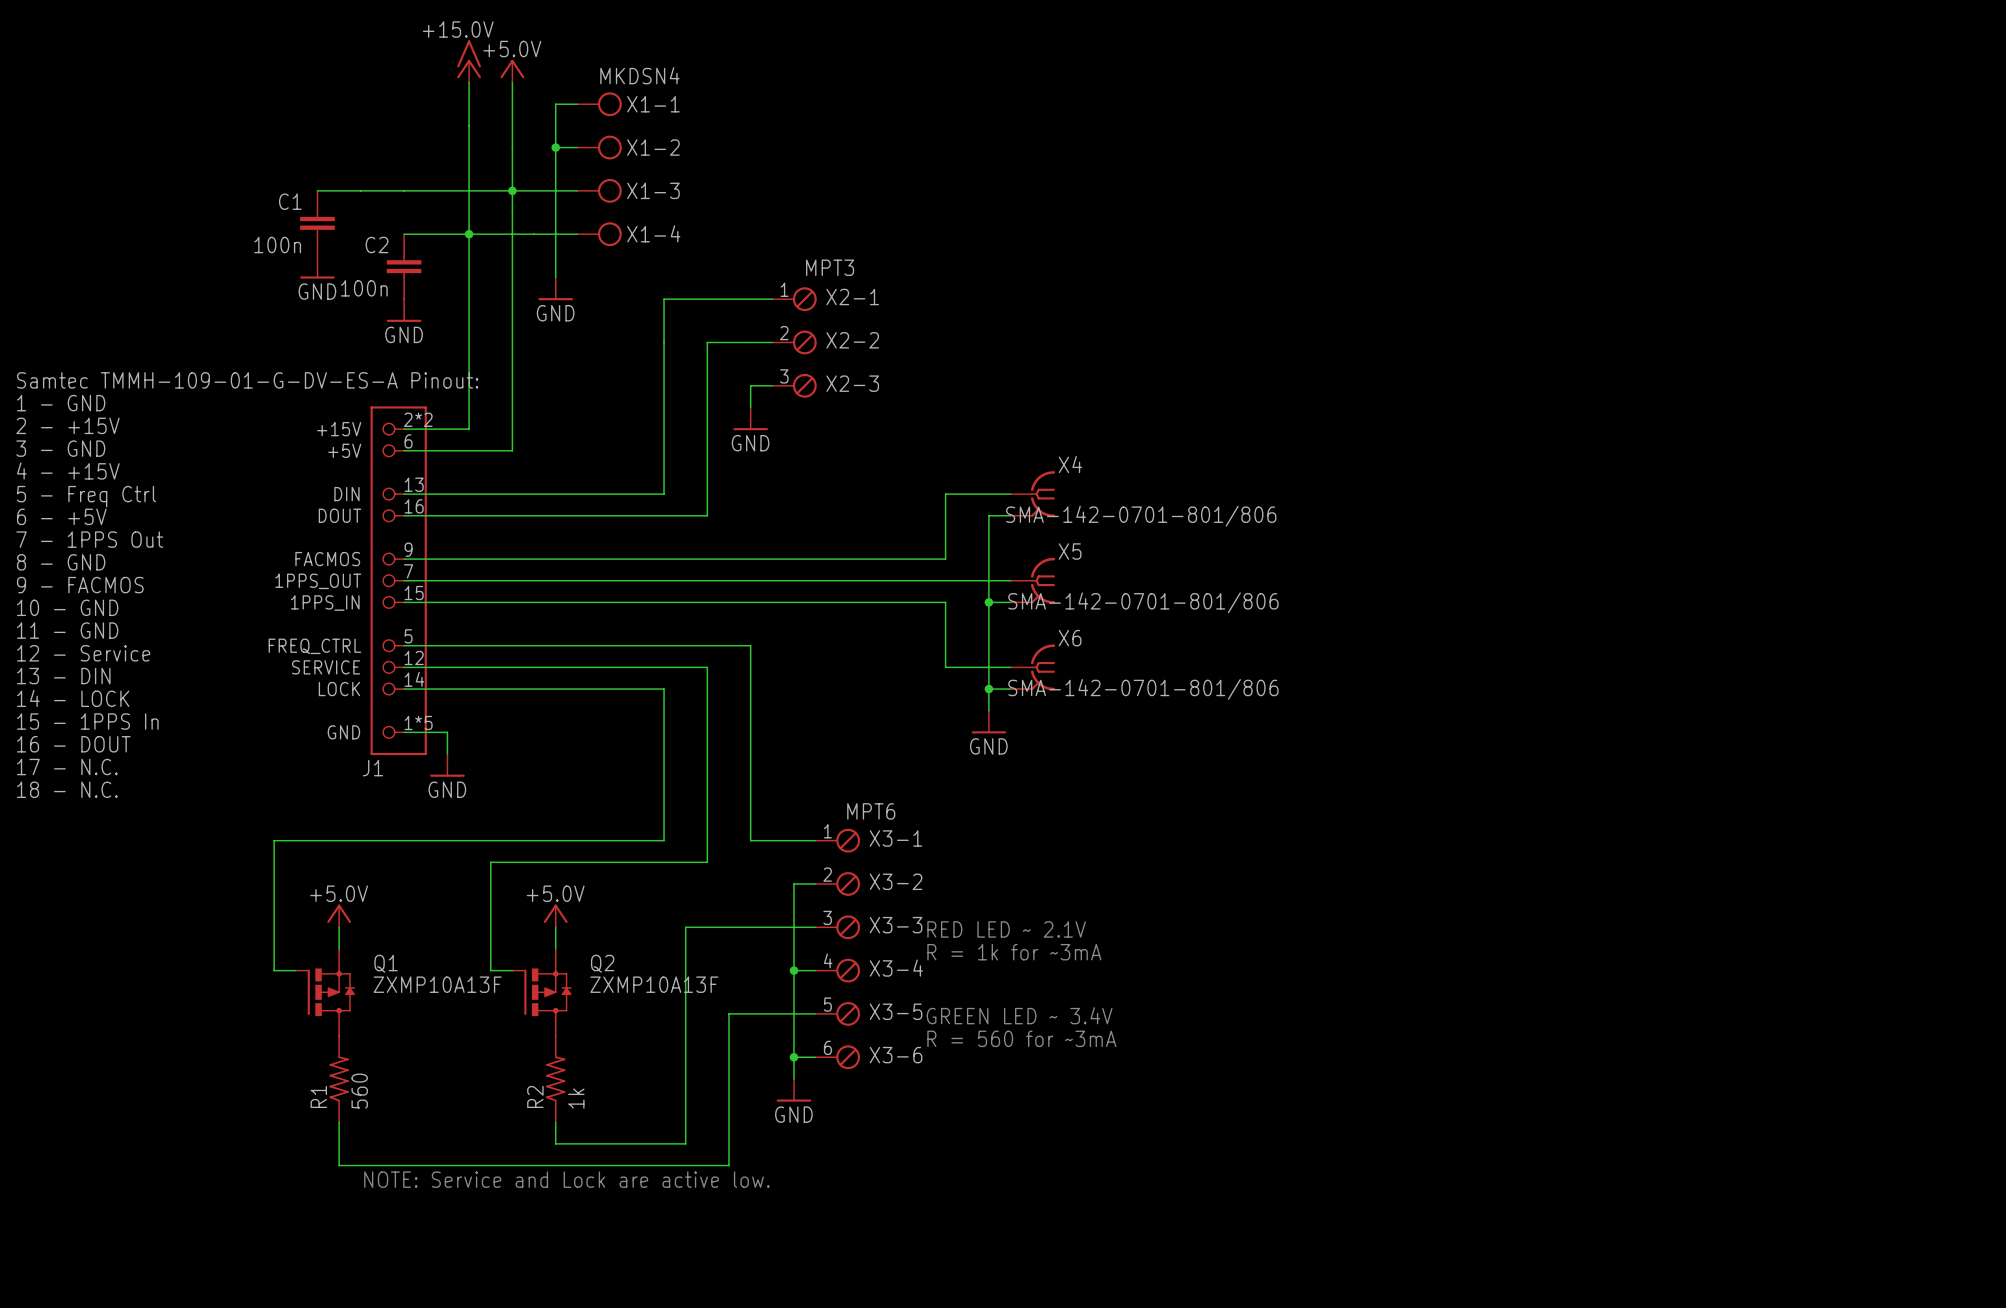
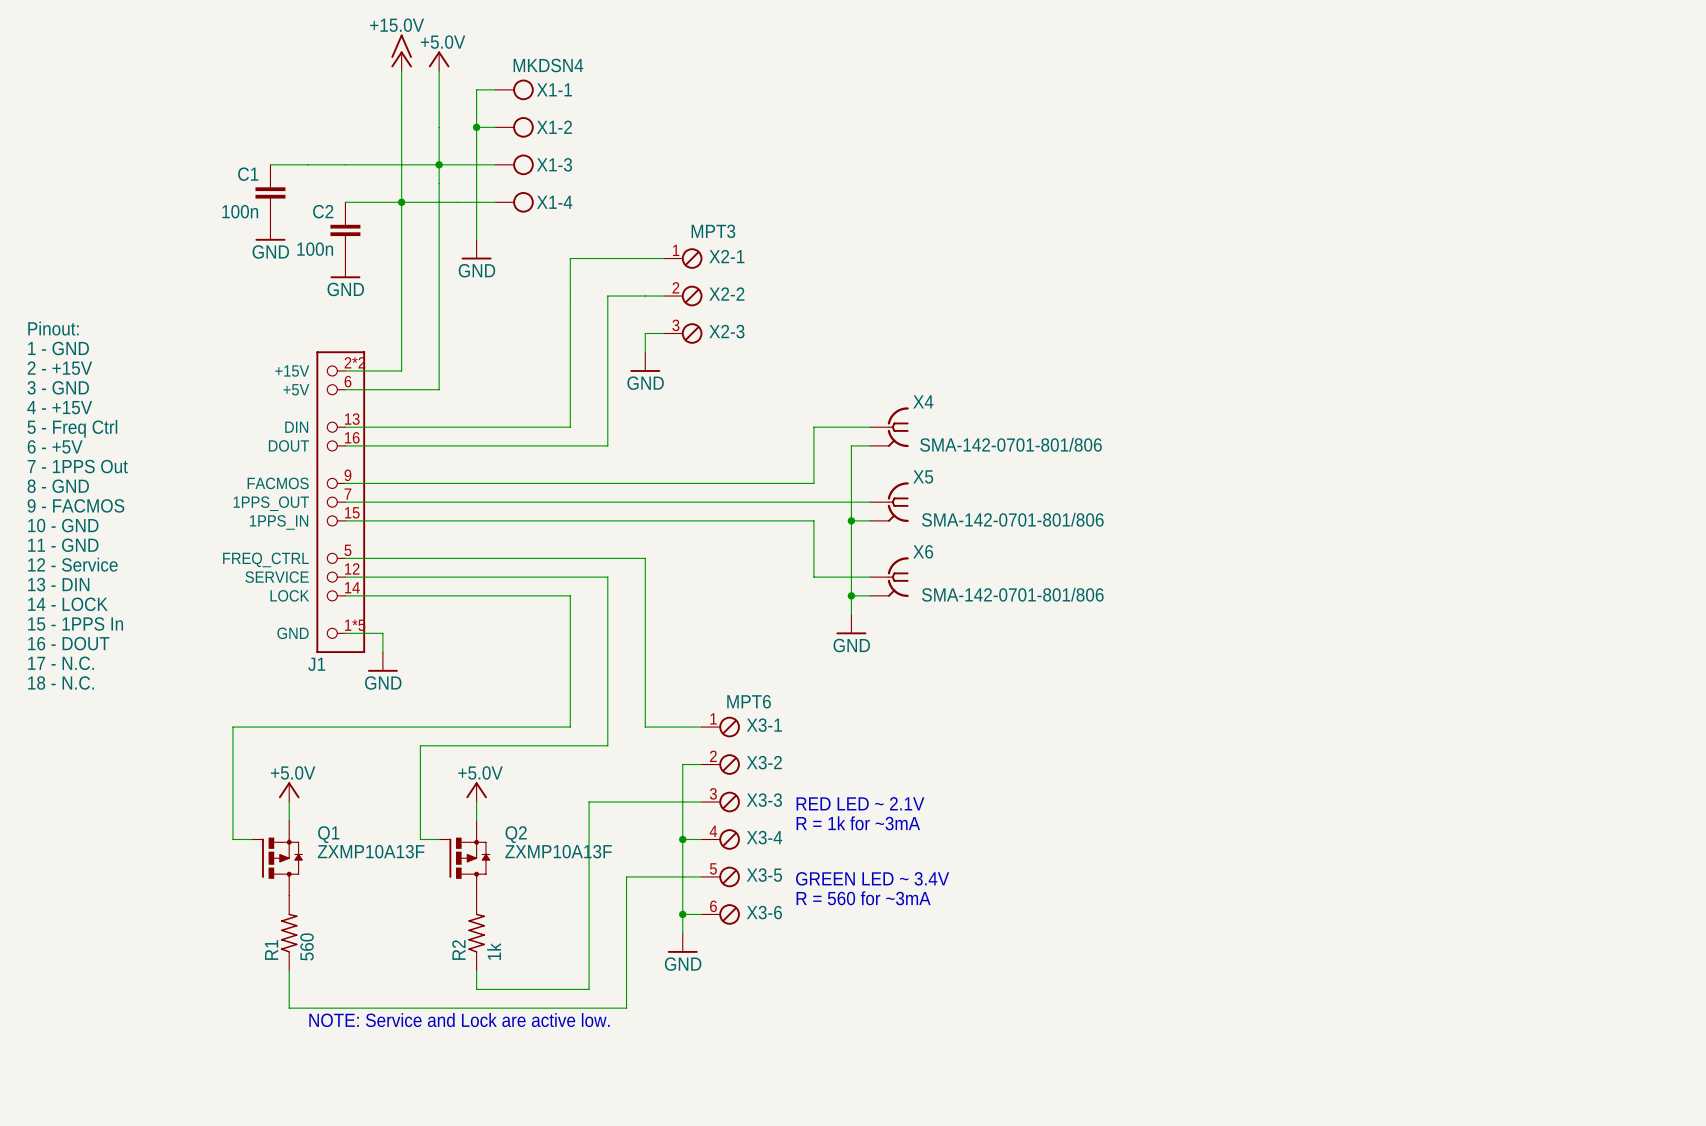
J1 symbol: [370, 406, 427, 756] -> [316, 351, 366, 654]

